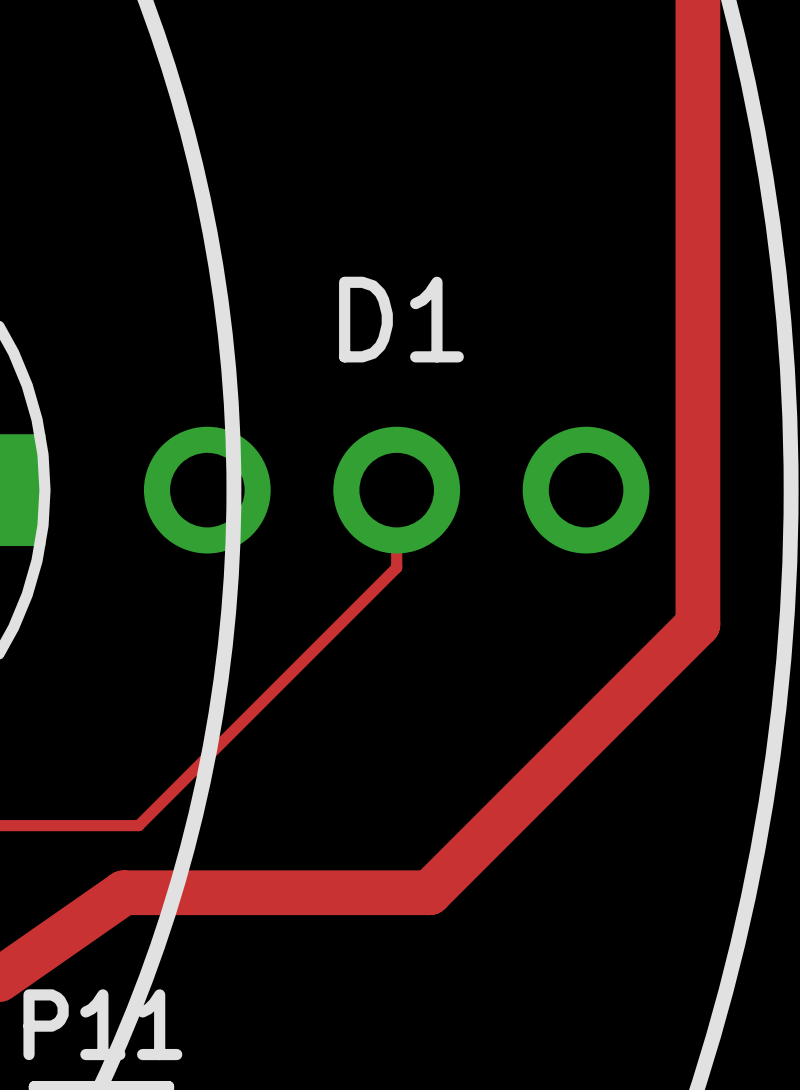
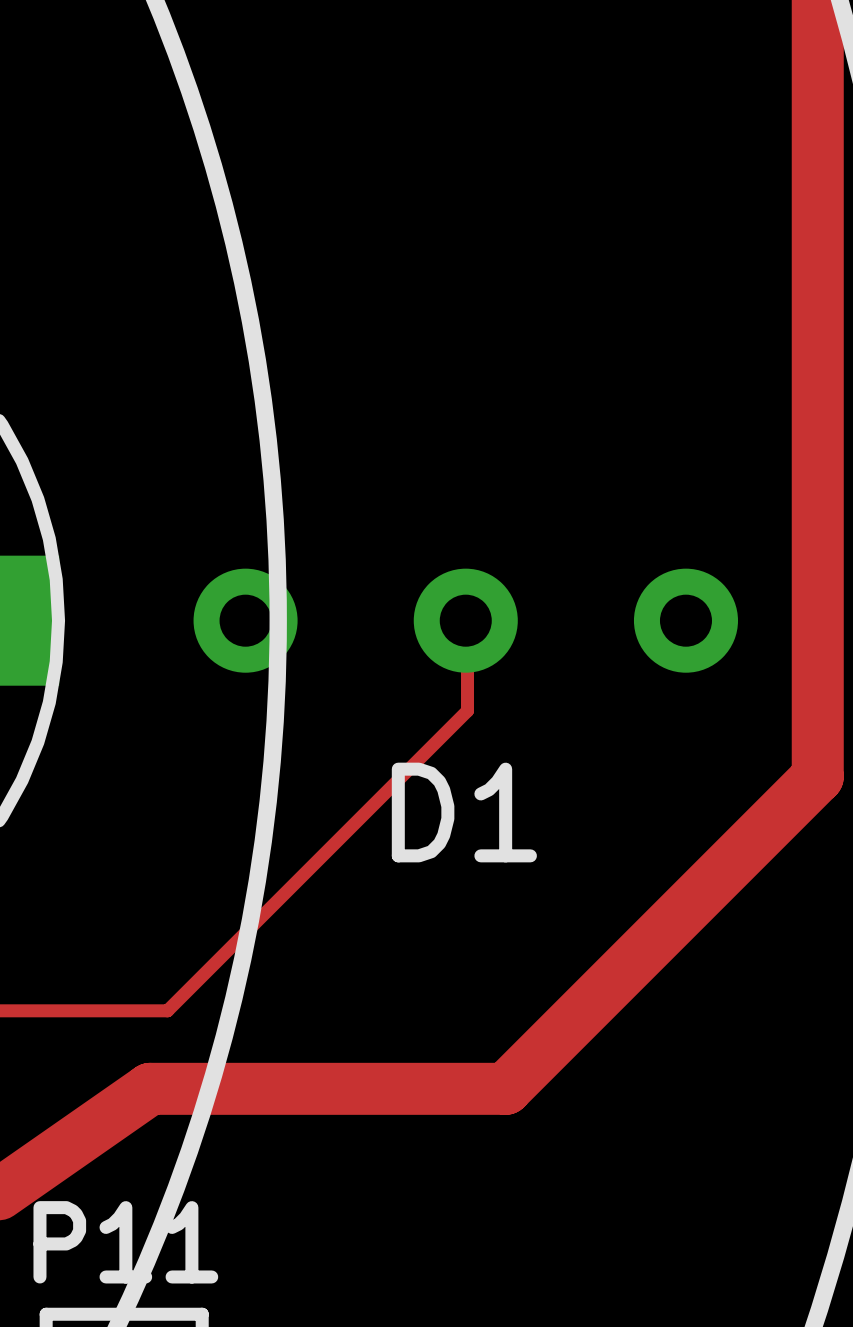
D1 name position: D1 (401, 319) -> D1 (464, 812)
D1 footprint: [143, 426, 650, 554] -> [193, 568, 739, 673]

